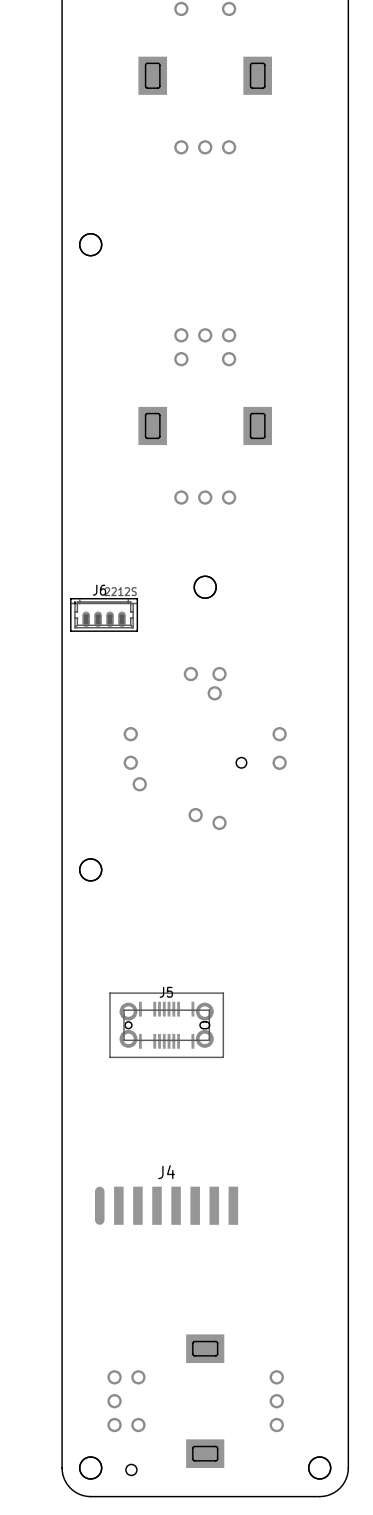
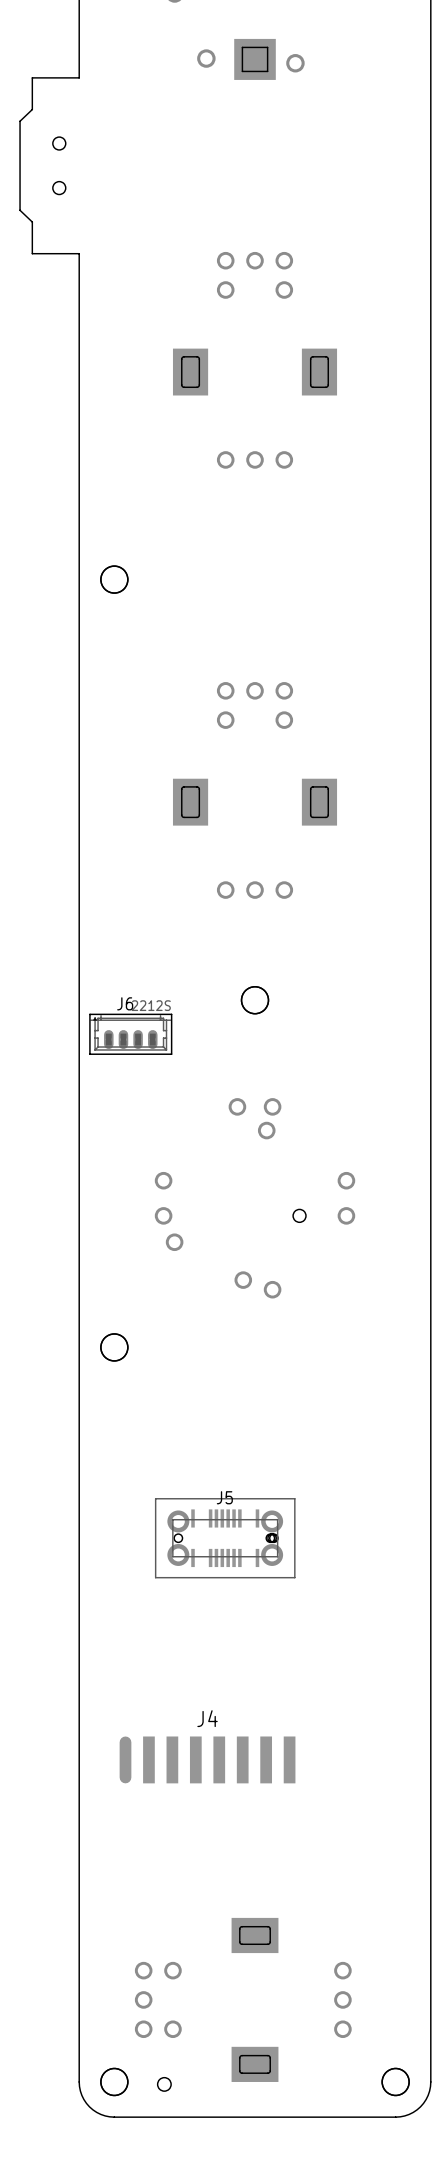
J5 footprint: [109, 992, 224, 1058] -> [155, 1498, 296, 1579]

